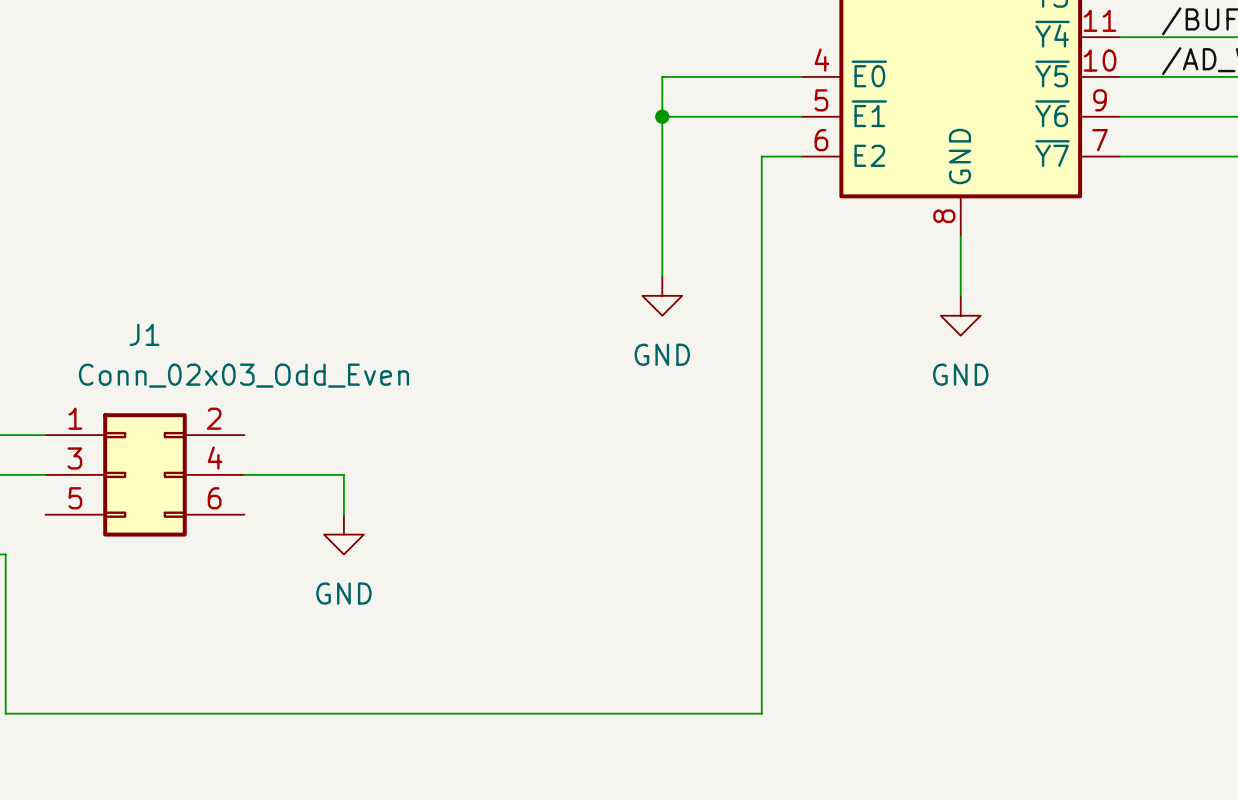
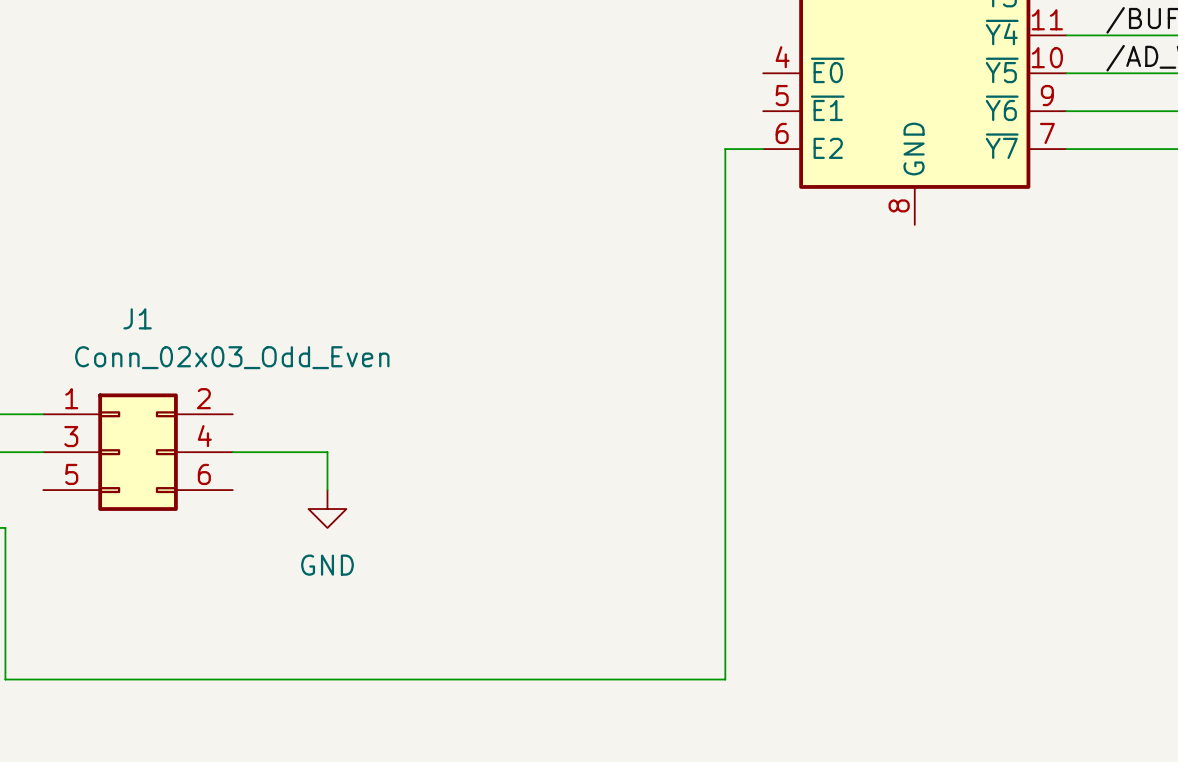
wire: (801, 76) (662, 76) (662, 275) -> none
wire: (662, 116) (801, 116) -> none
junction: (662, 116) -> none
wire: (960, 236) (960, 295) -> none
power symbol: GND (662, 295) -> none
power symbol: GND (960, 315) -> none

